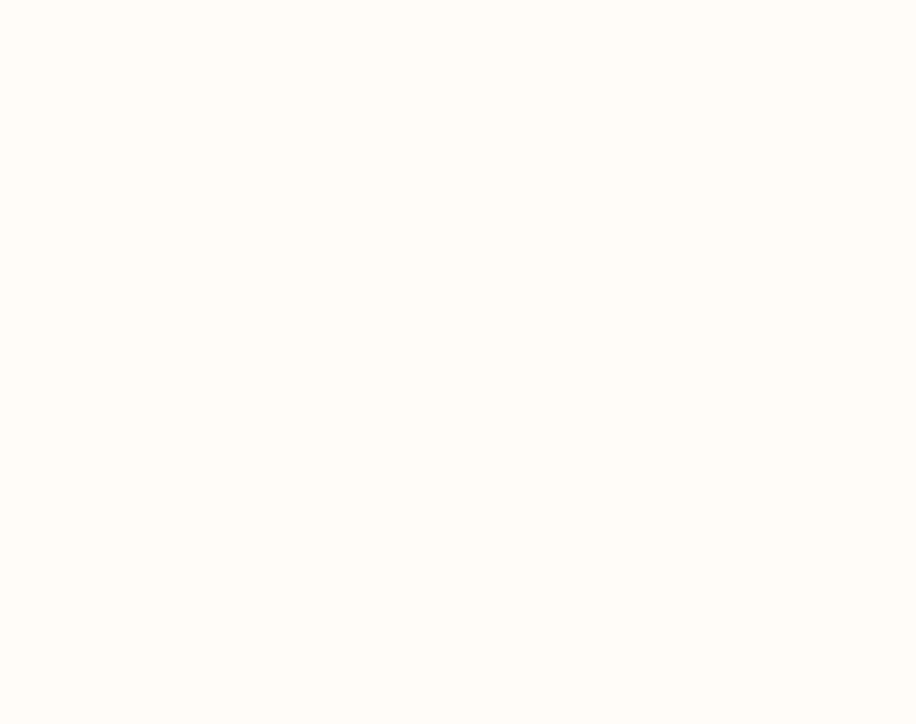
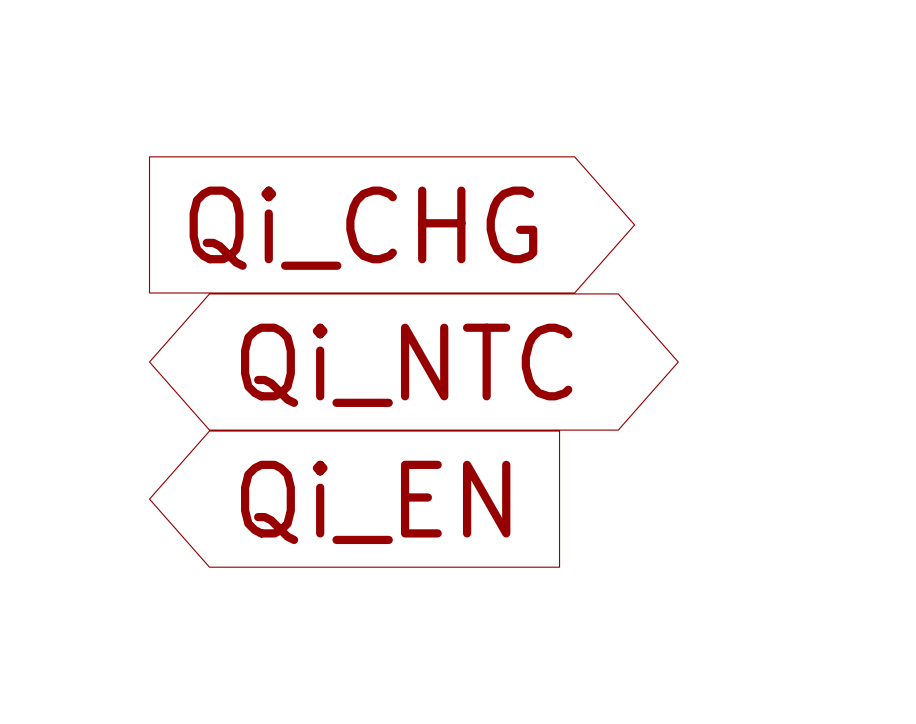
global label: none -> Qi_CHG (363, 228)
global label: none -> Qi_NTC (406, 365)
global label: none -> Qi_EN (375, 502)

